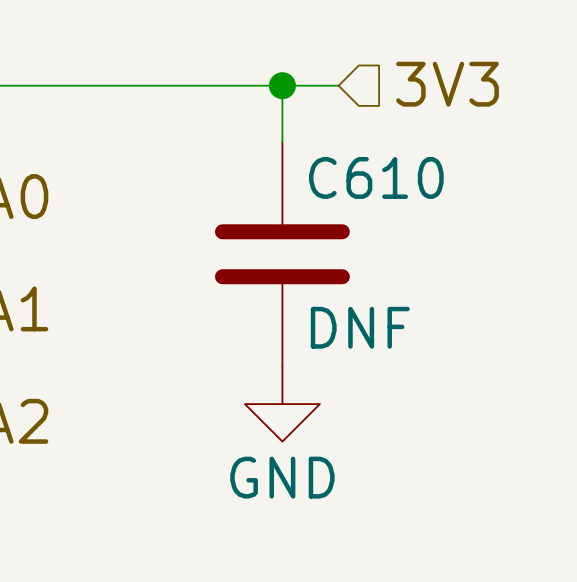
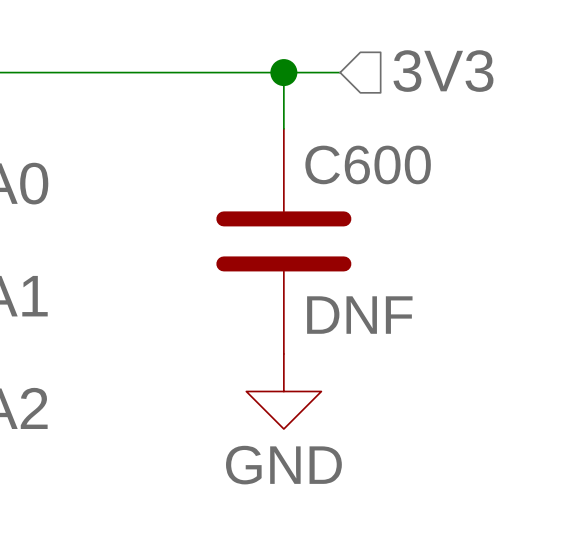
C610 name: C610 (376, 177) -> C600 (368, 164)

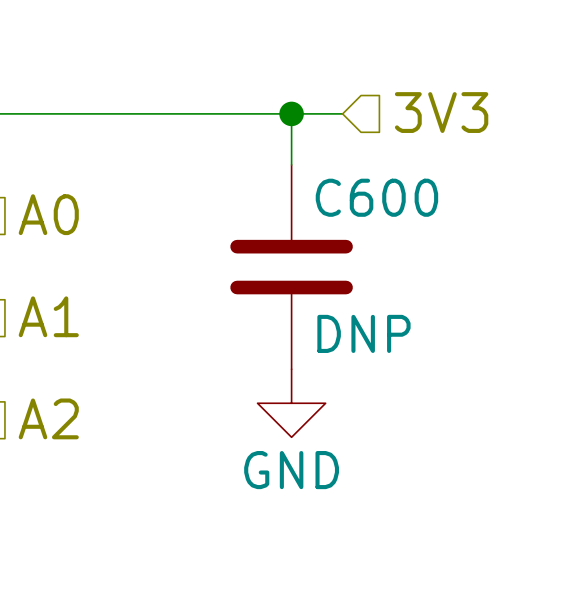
C600 value: DNF (359, 315) -> DNP (363, 333)

